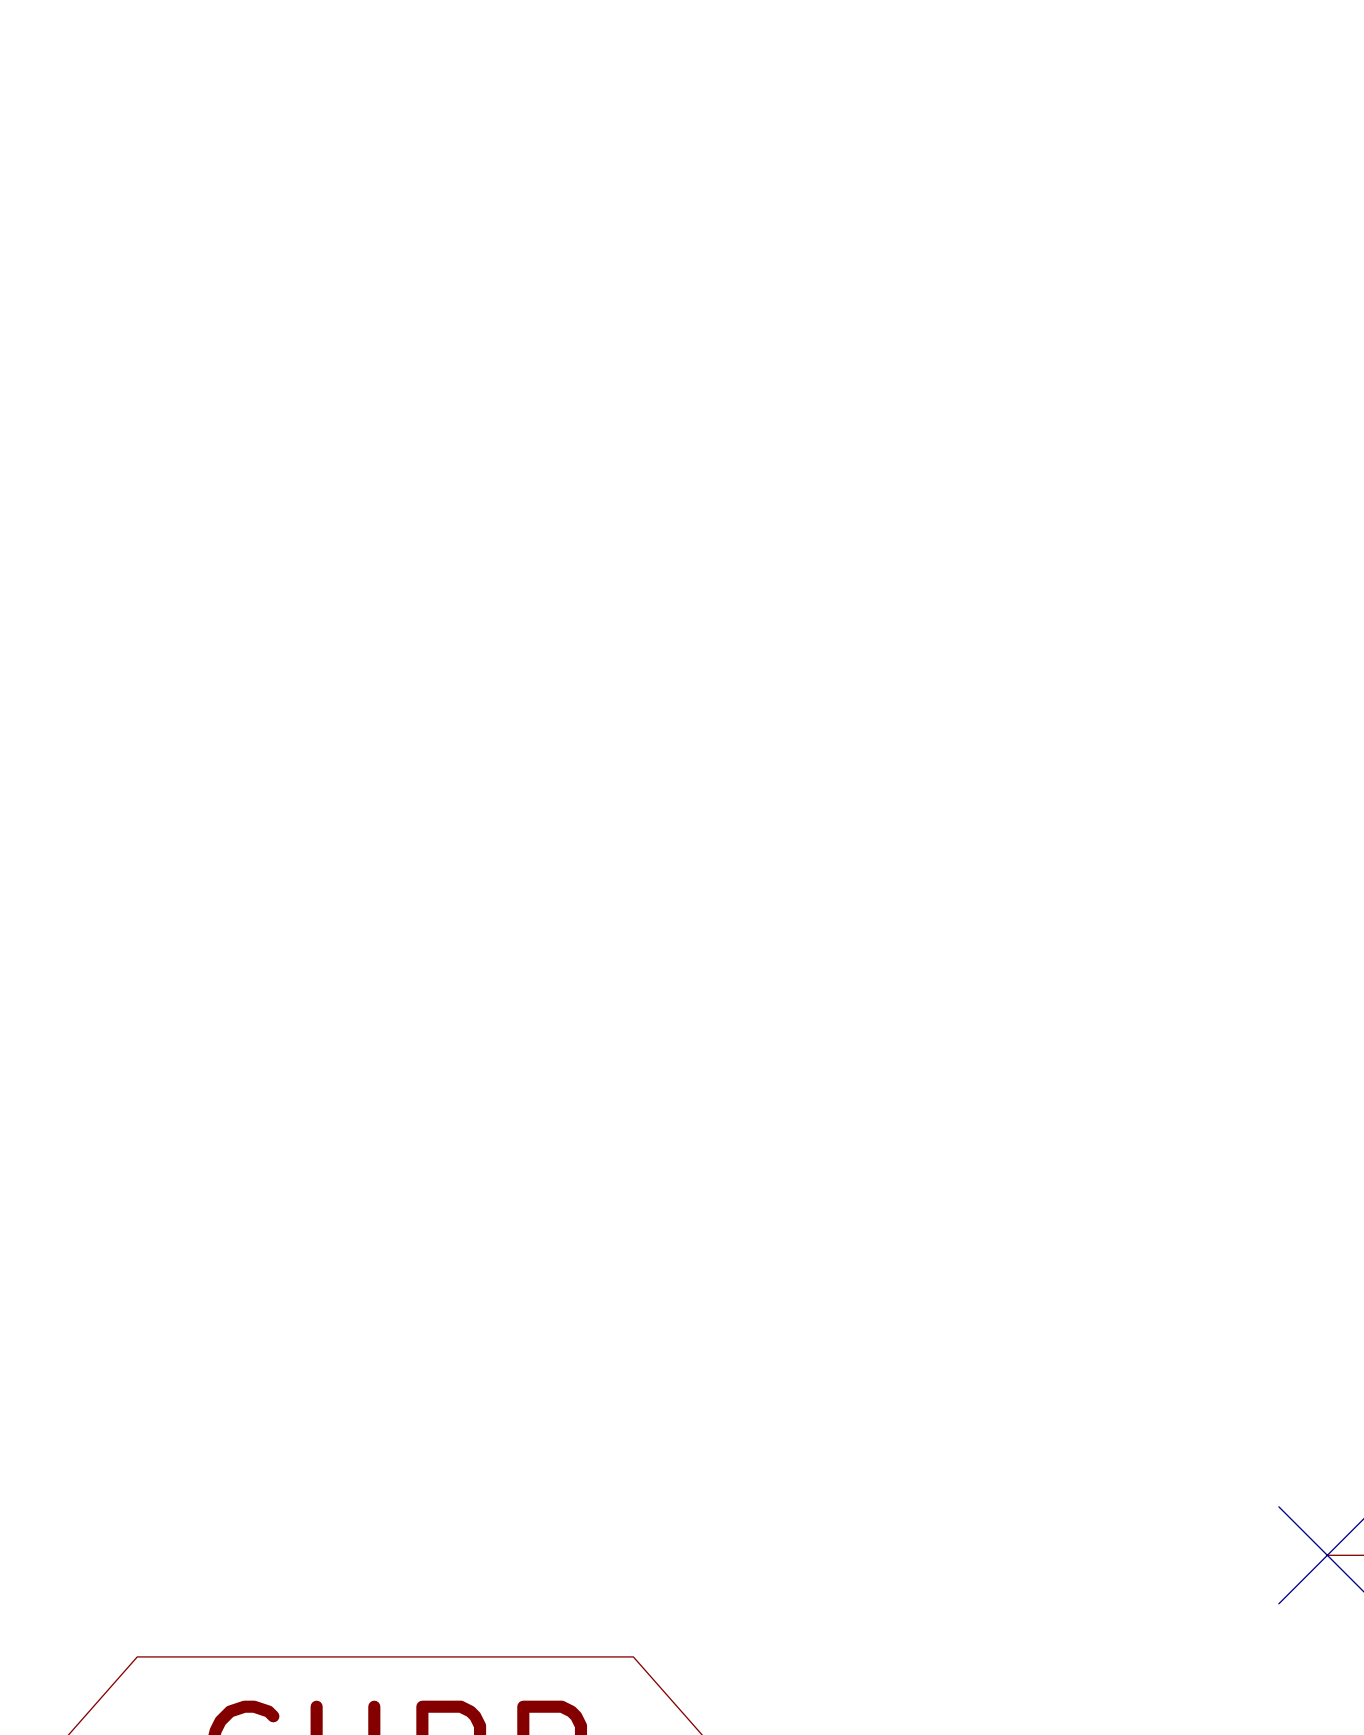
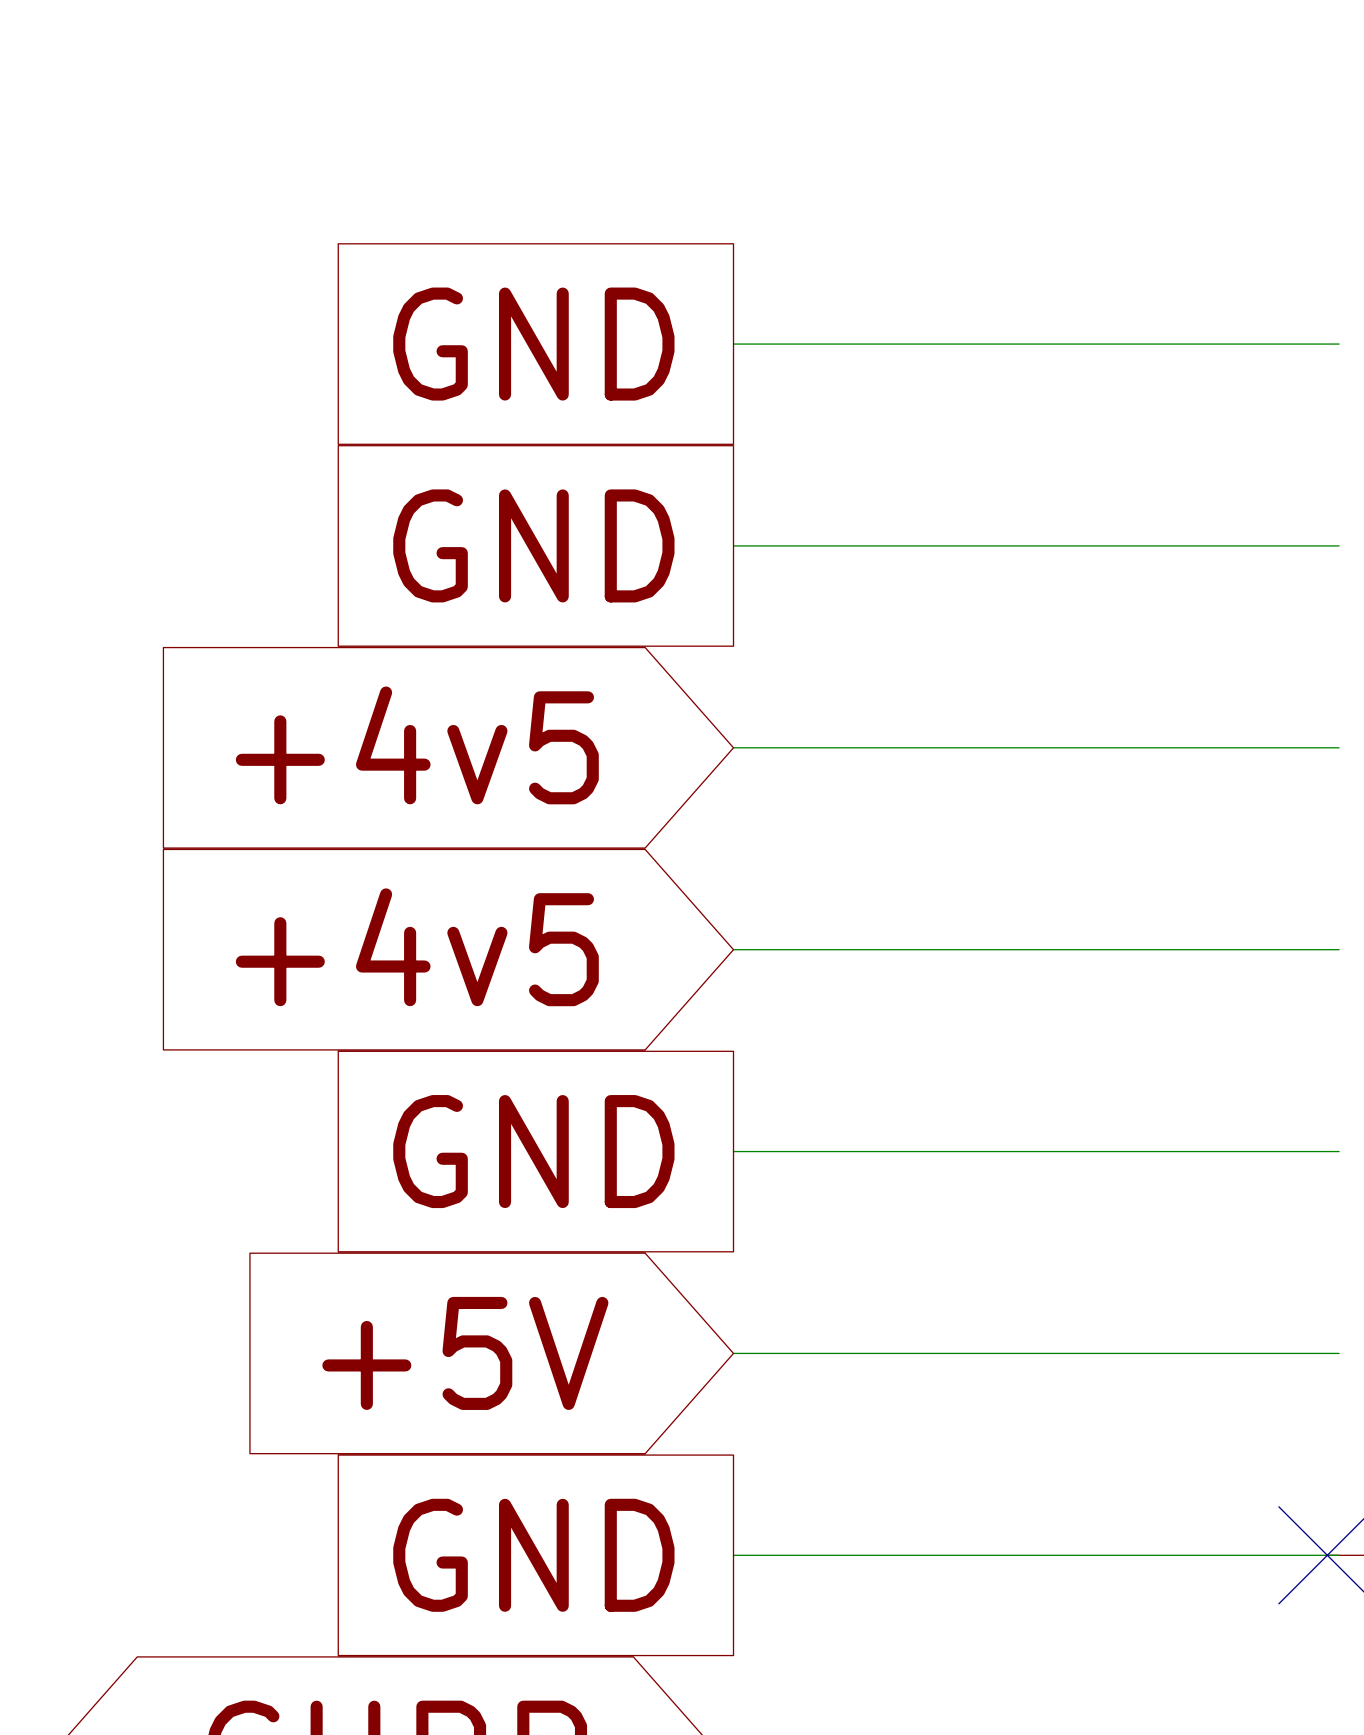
global label: none -> GND (533, 344)
wire: none -> (733, 344) (1339, 344)
global label: none -> GND (533, 545)
wire: none -> (733, 545) (1339, 545)
global label: none -> +4v5 (417, 745)
wire: none -> (733, 747) (1339, 747)
global label: none -> +4v5 (417, 947)
wire: none -> (733, 949) (1339, 949)
global label: none -> GND (533, 1151)
wire: none -> (733, 1151) (1339, 1151)
global label: none -> +5V (465, 1353)
wire: none -> (733, 1353) (1339, 1353)
global label: none -> GND (533, 1555)
wire: none -> (733, 1555) (1339, 1555)

